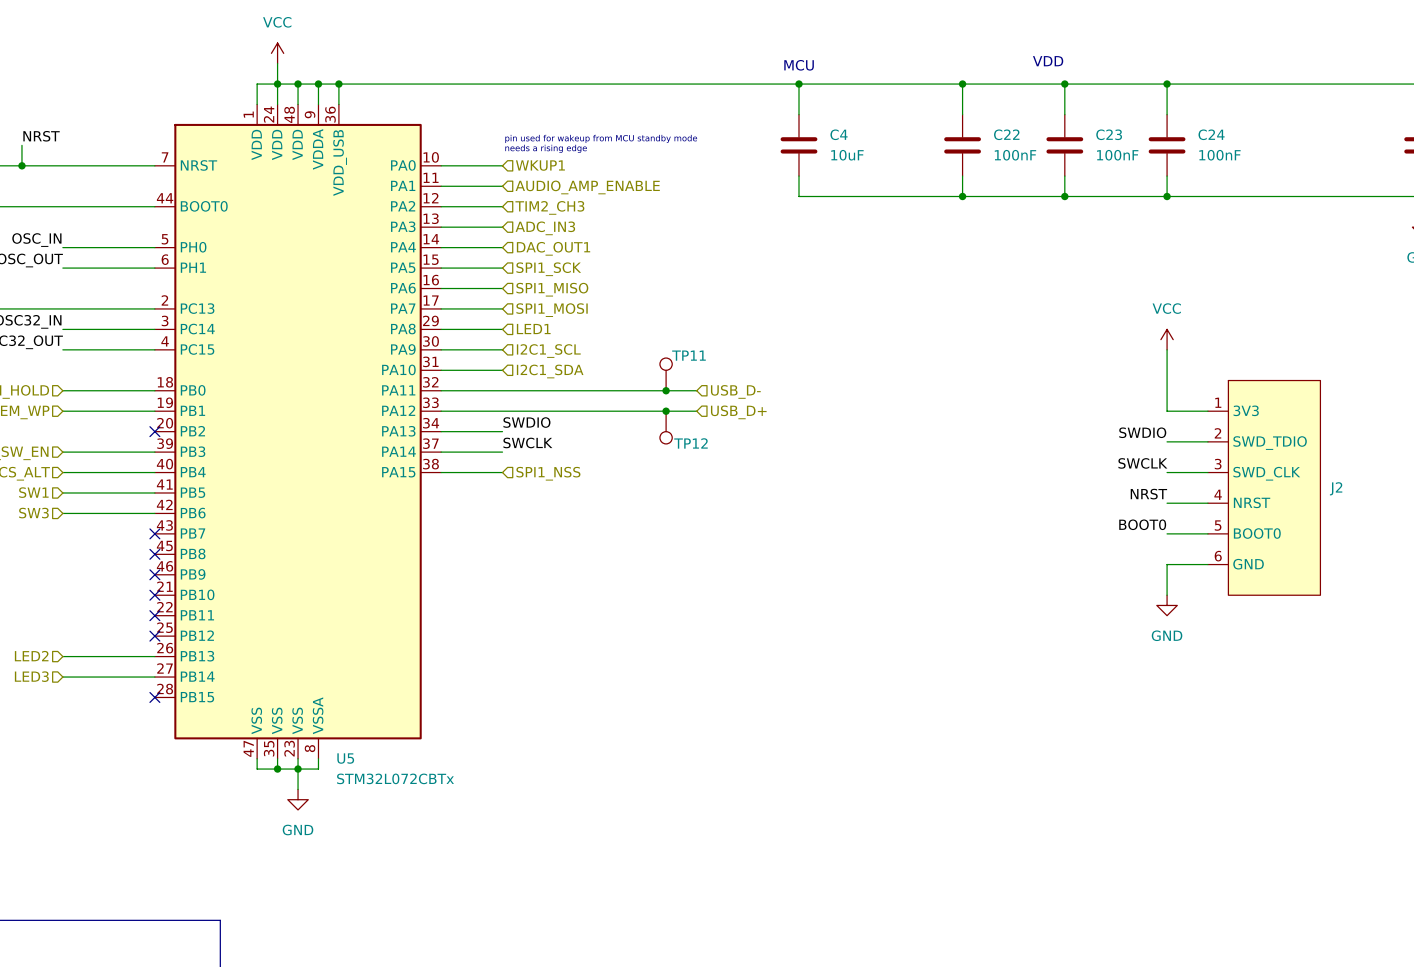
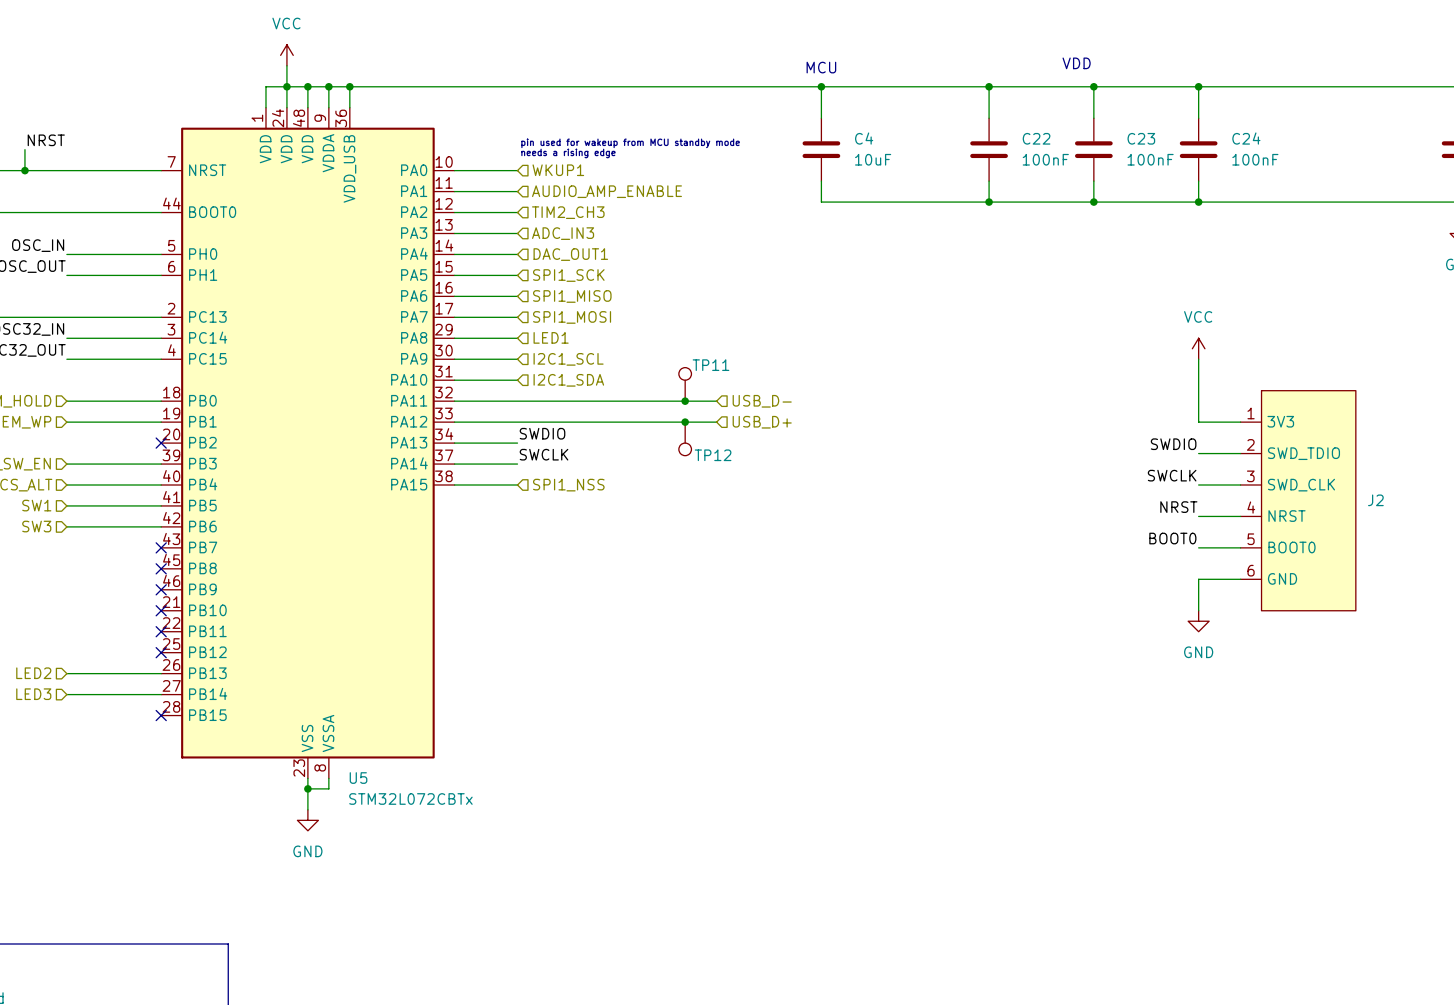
U5 symbol: [154, 104, 442, 759] -> [161, 107, 455, 779]
wire: (257, 758) (257, 769) (298, 769) -> none
wire: (277, 758) (277, 769) -> none
junction: (277, 769) -> none

